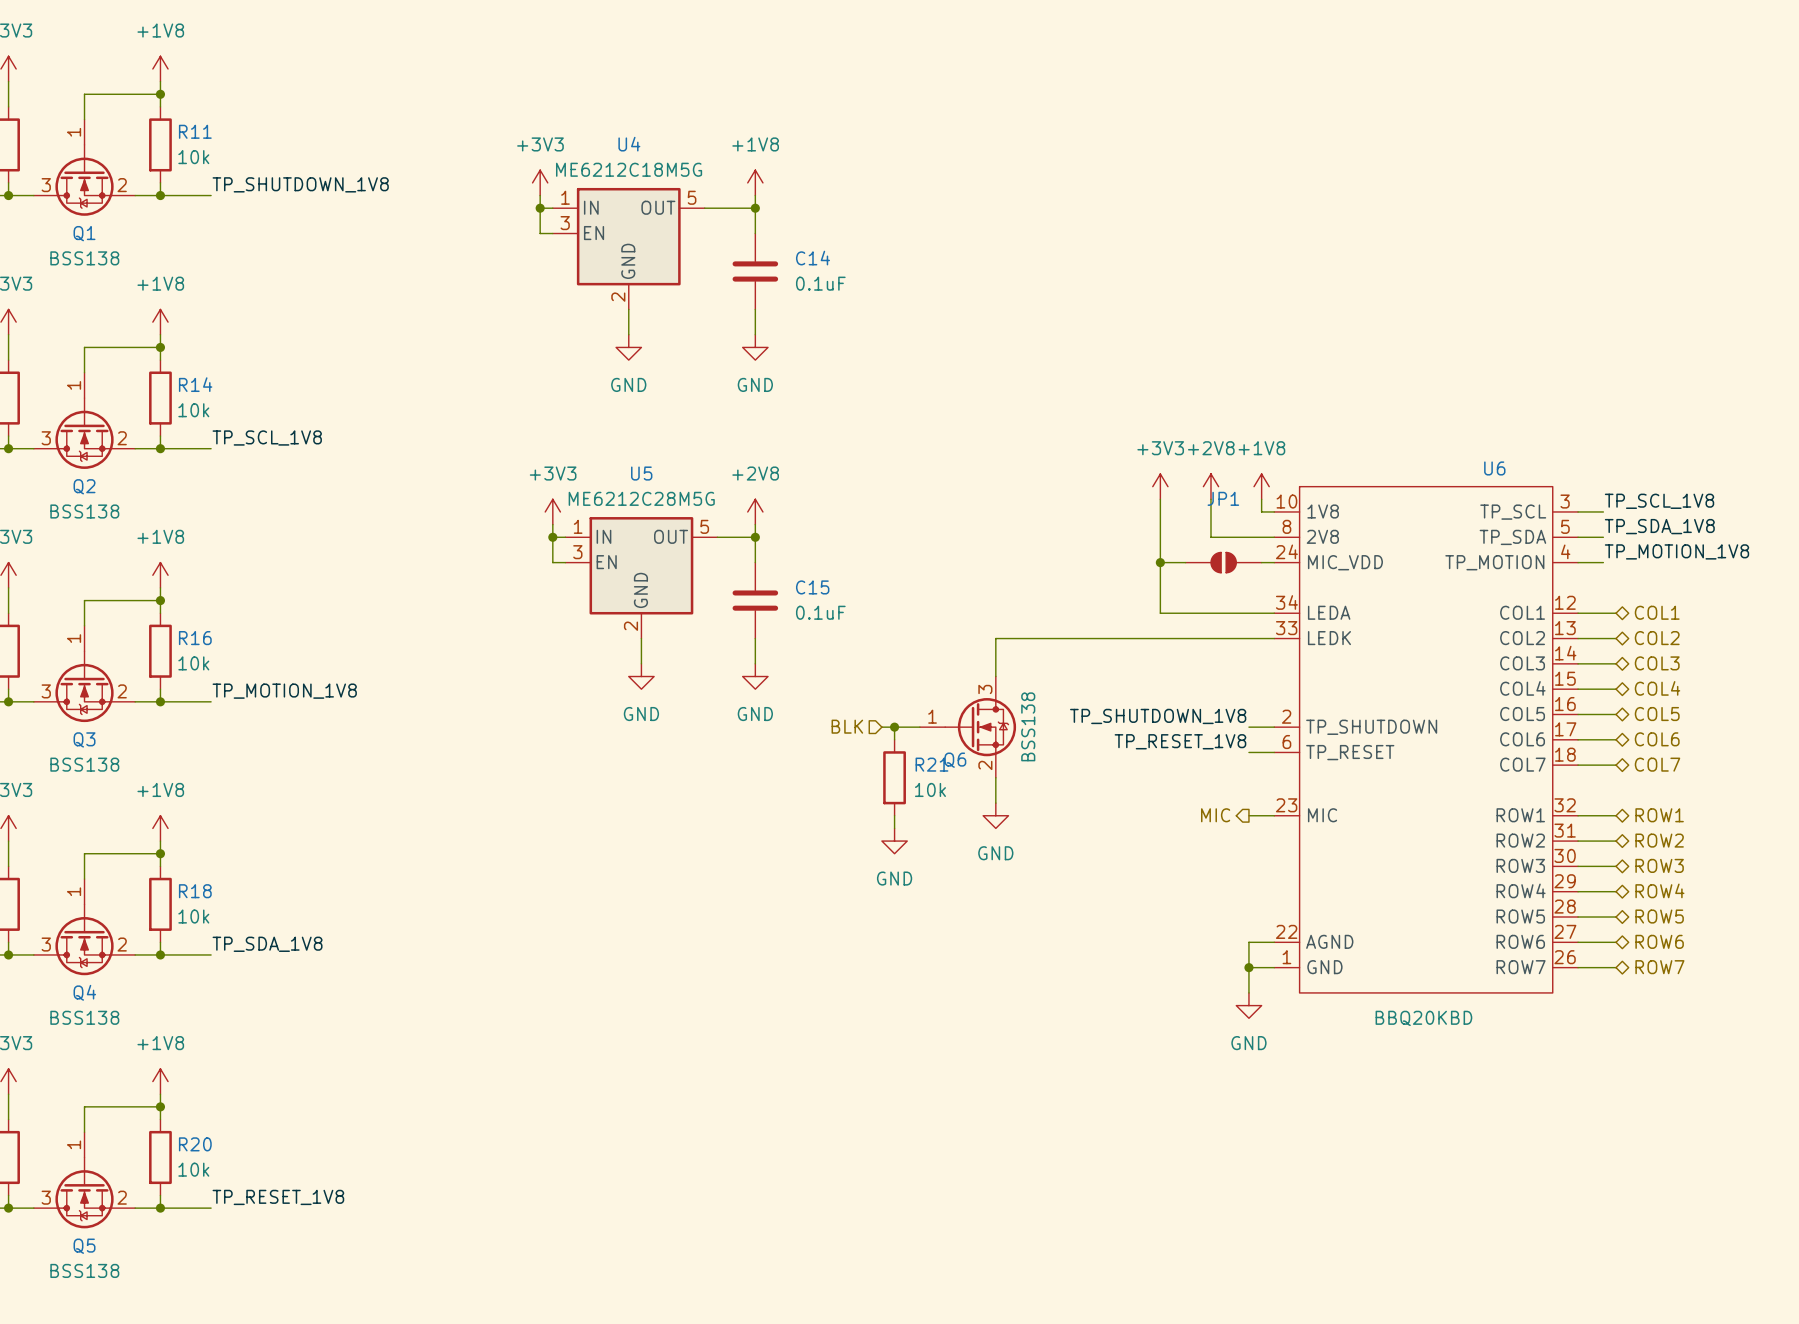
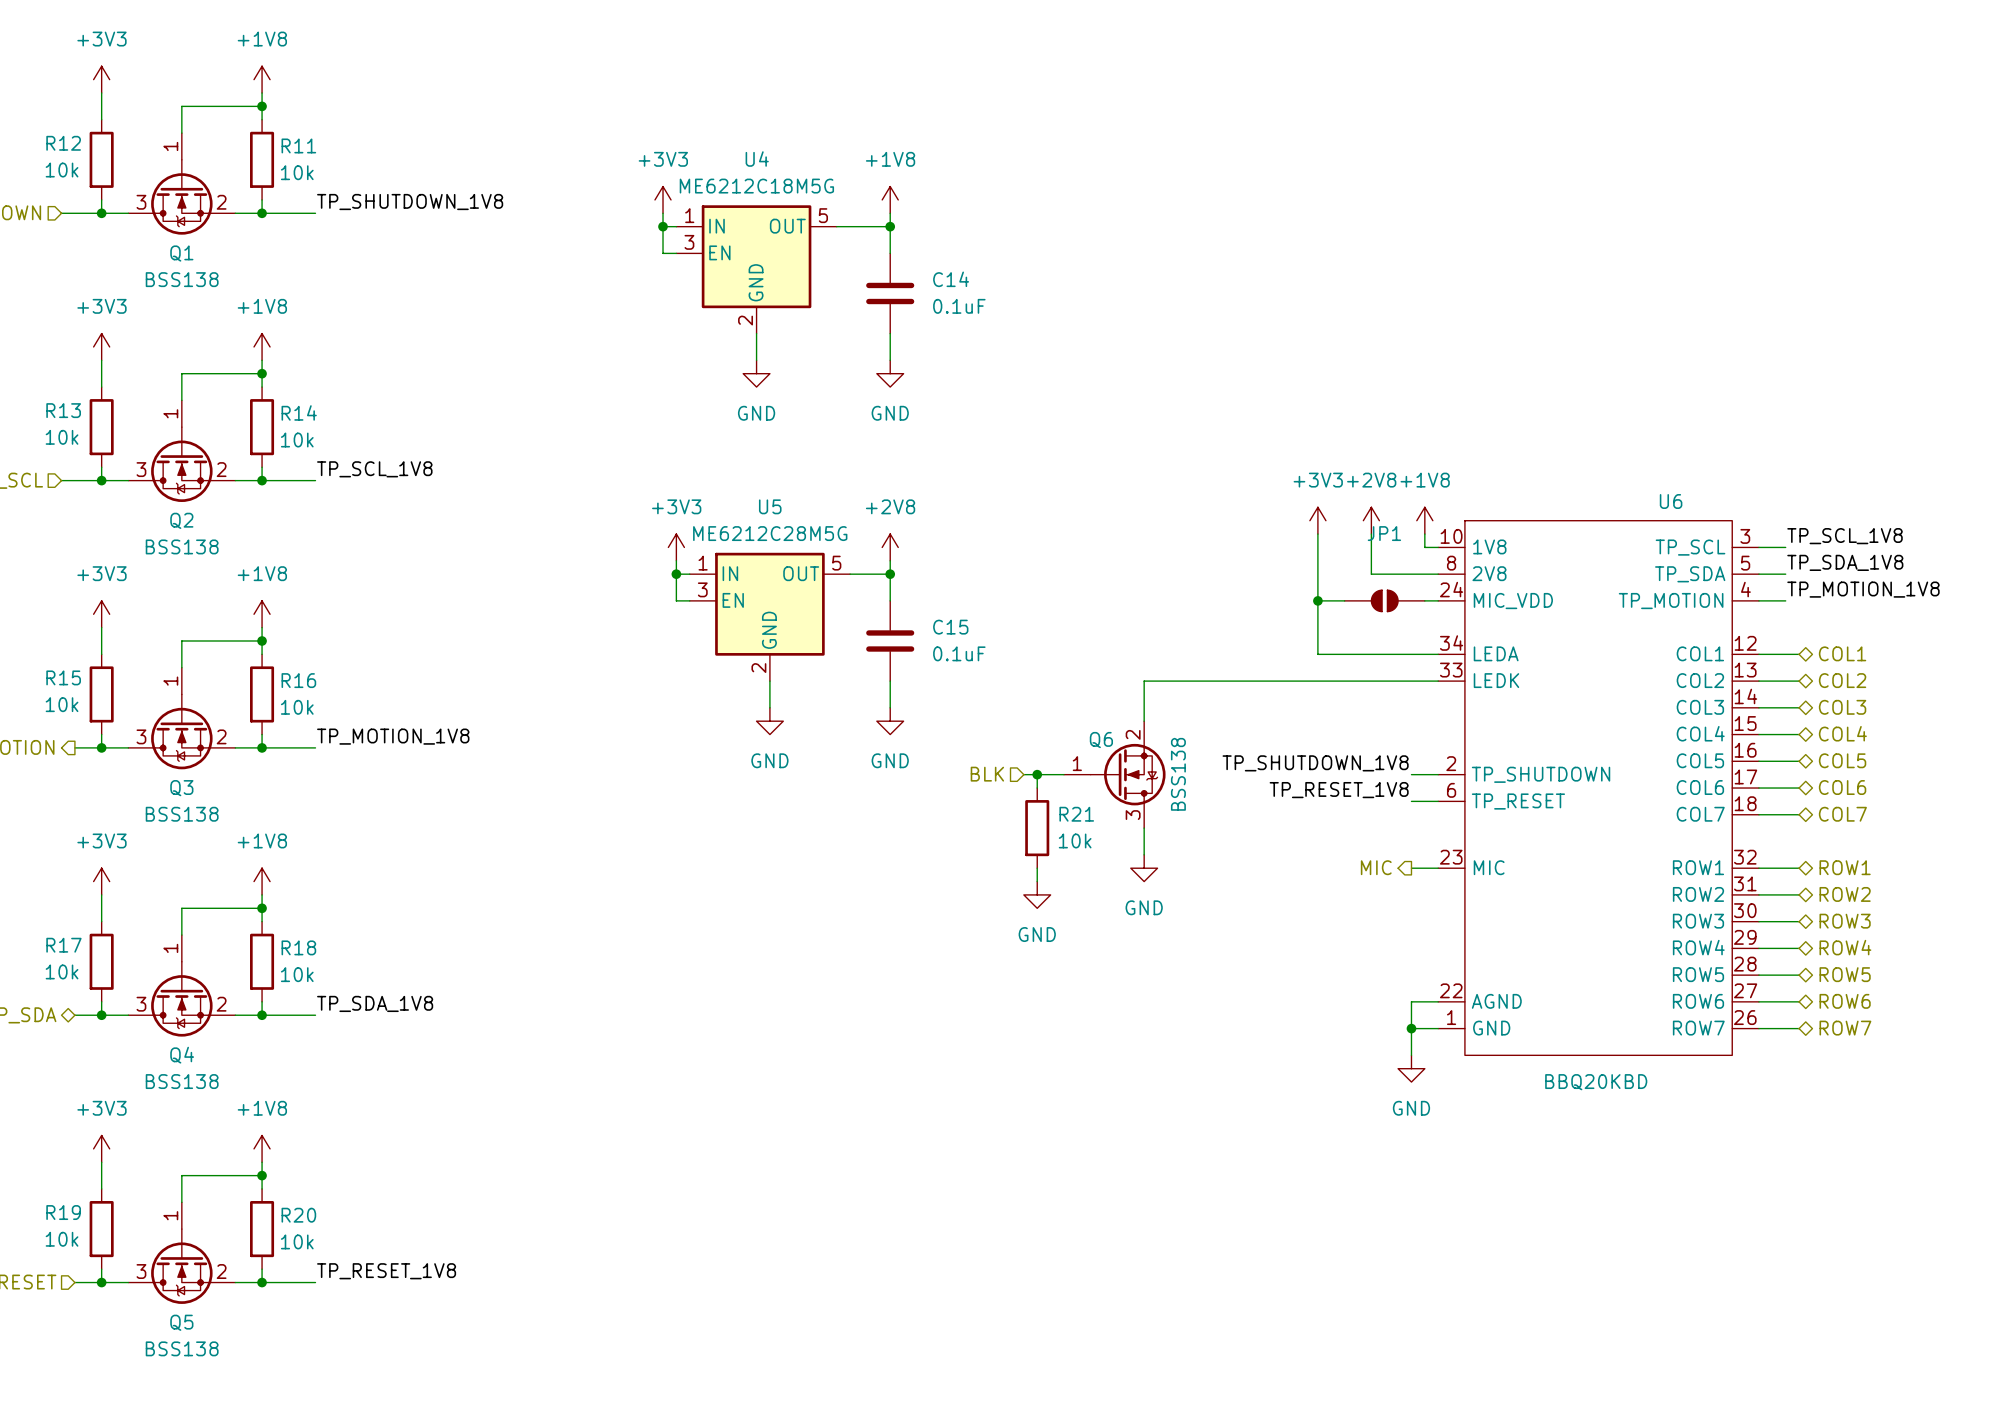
Q6 flip: as is (980, 727) -> up-down (1128, 774)

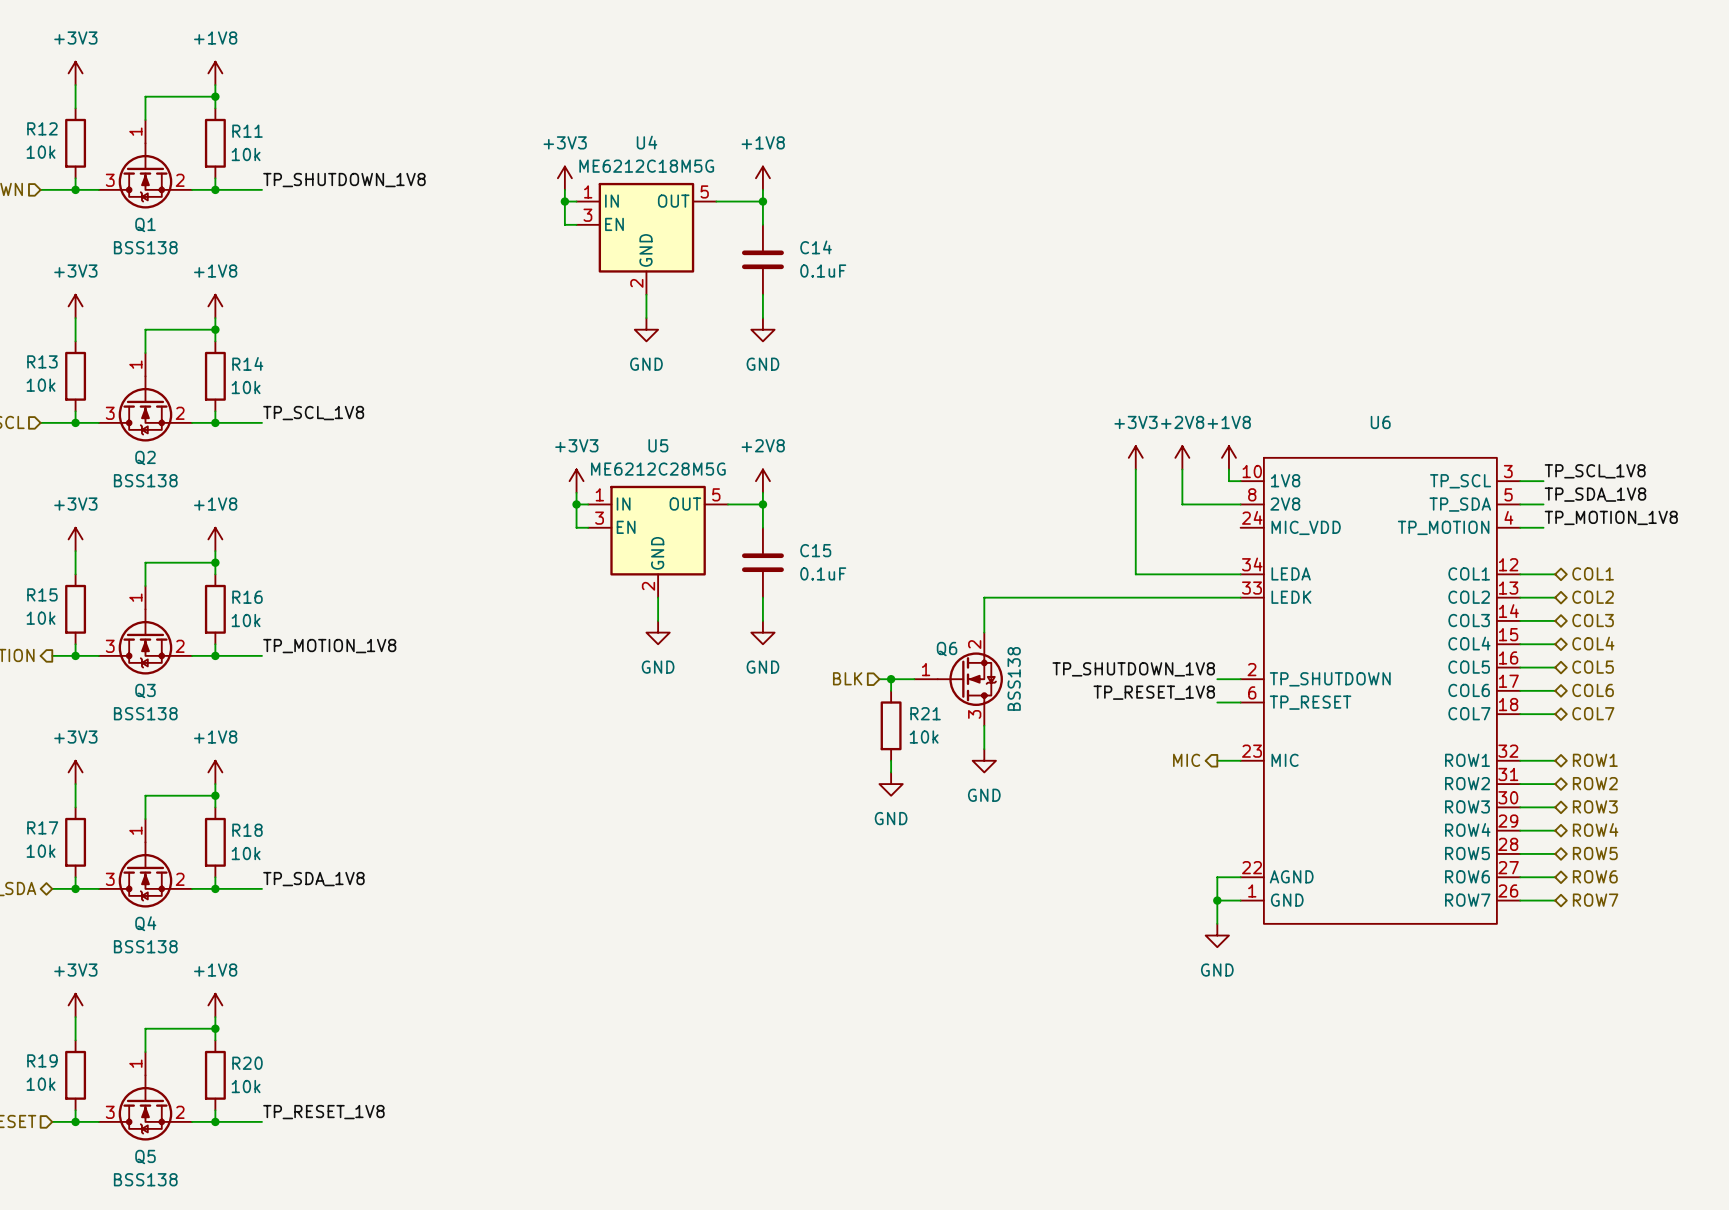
U6 name position: U6 (1671, 501) -> U6 (1380, 422)
wire: (1317, 600) (1344, 600) -> none
junction: (1317, 600) -> none
JP1: (1384, 600) -> none
wire: (1424, 600) (1438, 600) -> none
U6 value: BBQ20KBD (1596, 1082) -> none

